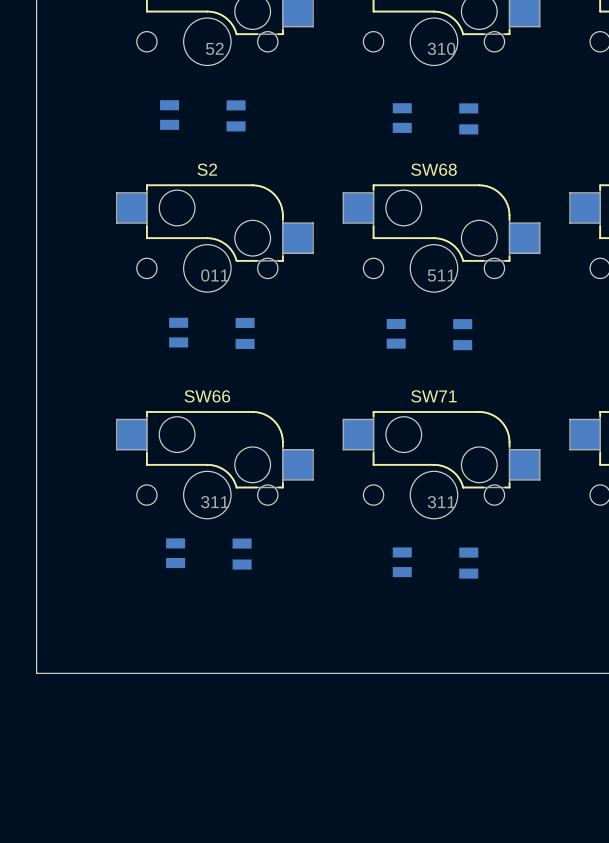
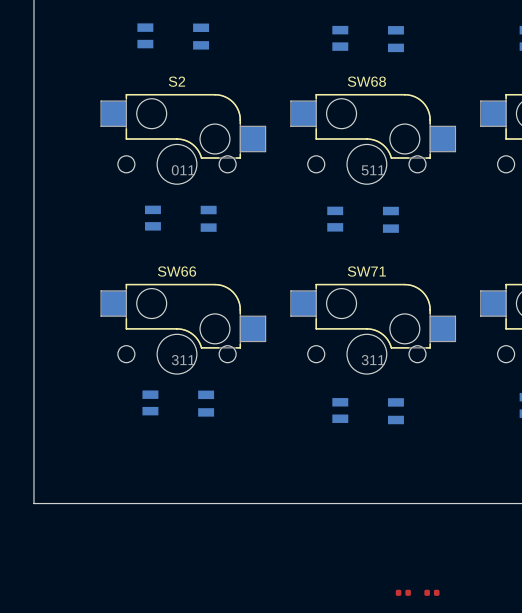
part: none -> (403, 592)
part: none -> (431, 592)

